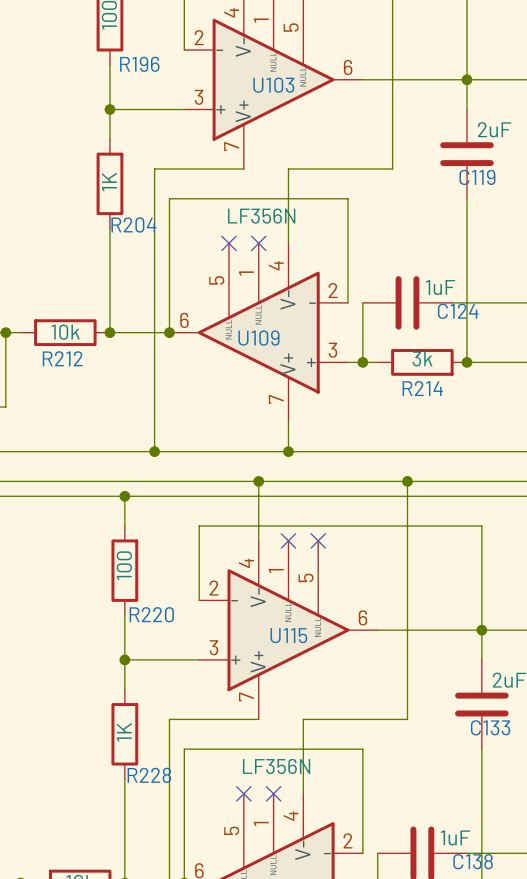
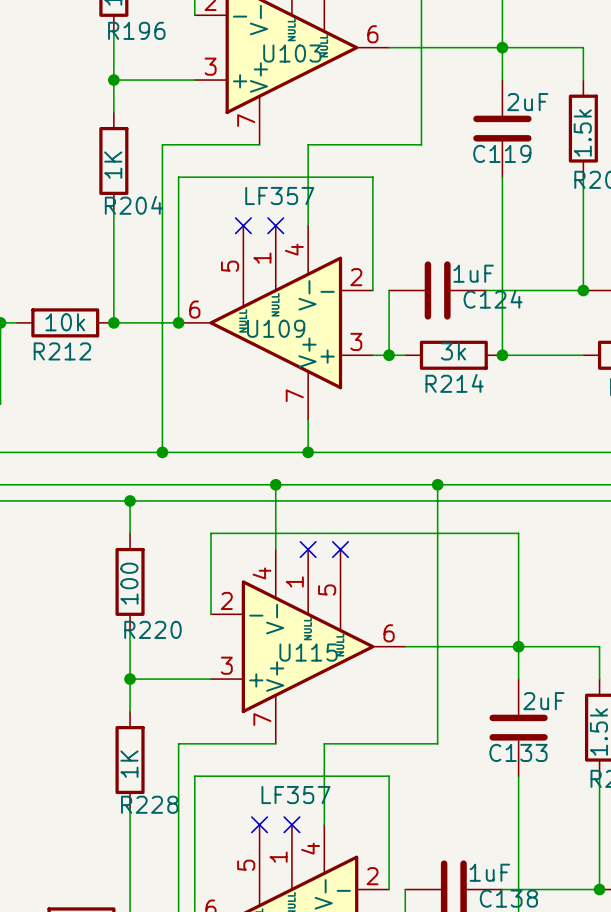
U109 value: LF356N (261, 216) -> LF357 (279, 196)
part value: LF356N (276, 766) -> LF357 (295, 795)

